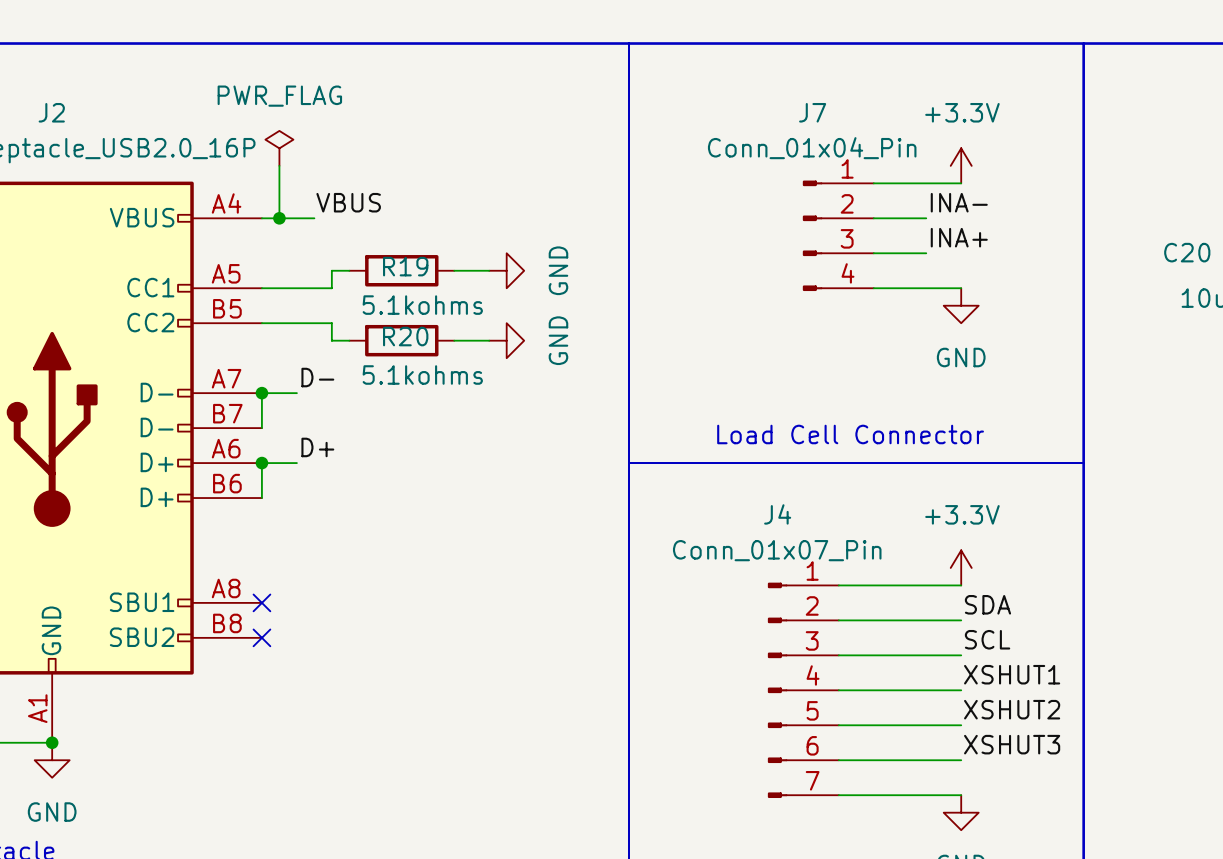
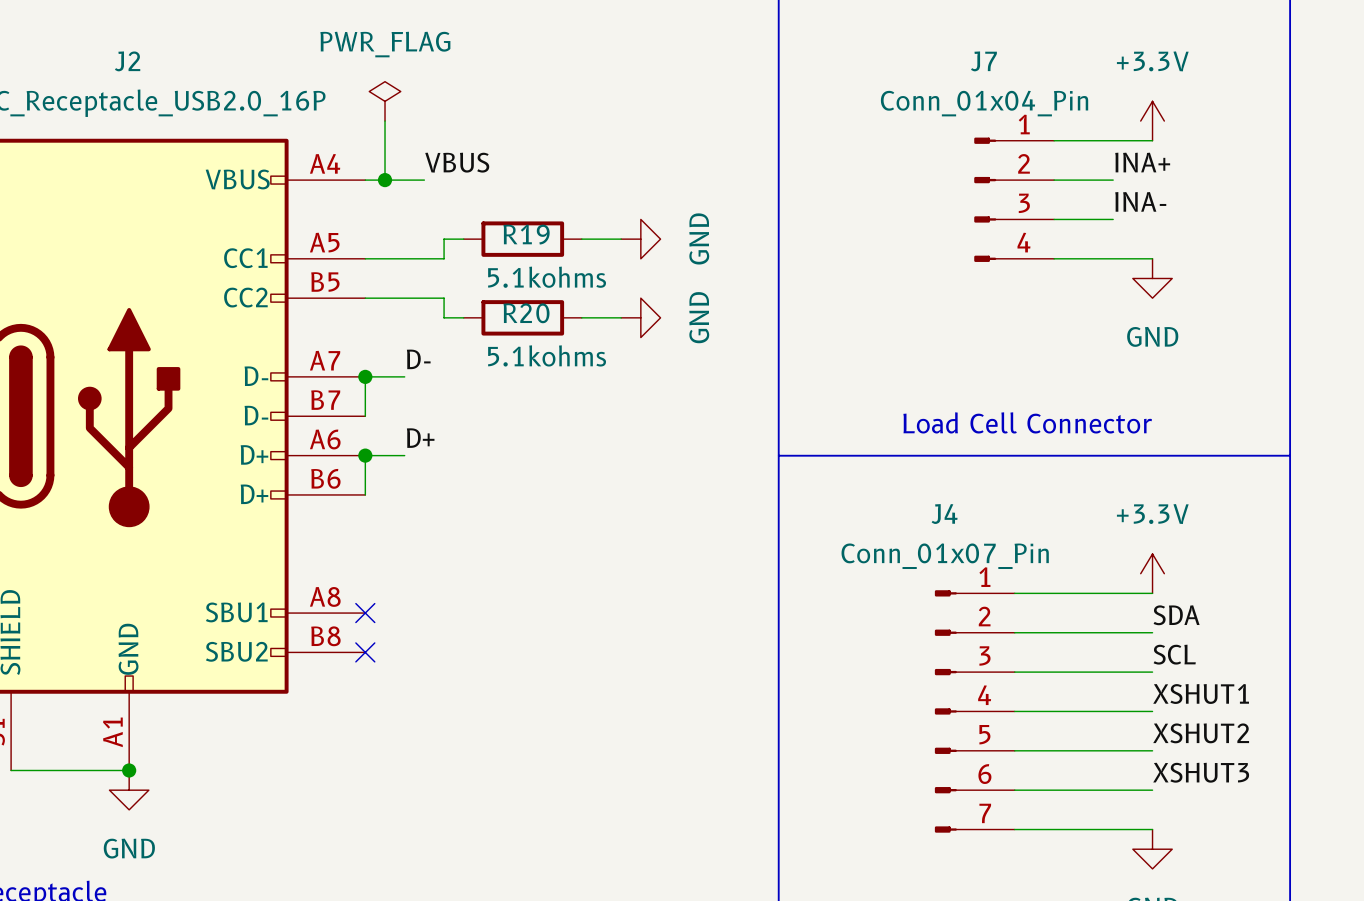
label: INA- (959, 202) -> INA+ (1142, 162)
label: INA+ (959, 237) -> INA- (1140, 201)

